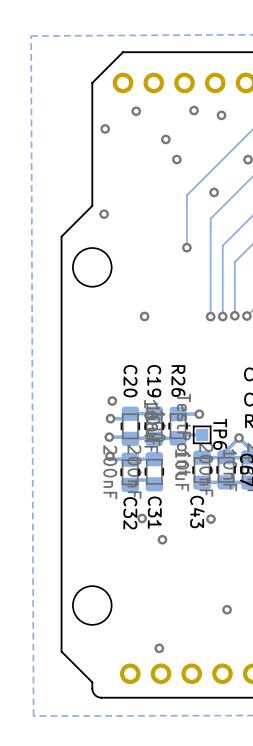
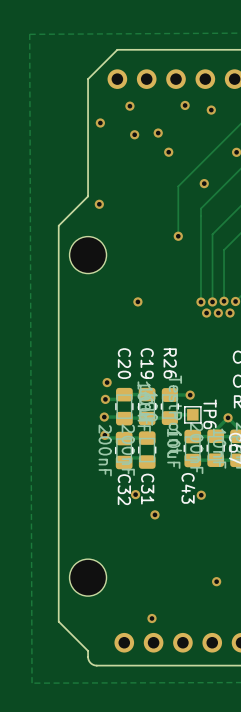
via: none -> (134, 134)
via: none -> (206, 313)
via: none -> (218, 313)
via: none -> (230, 313)

